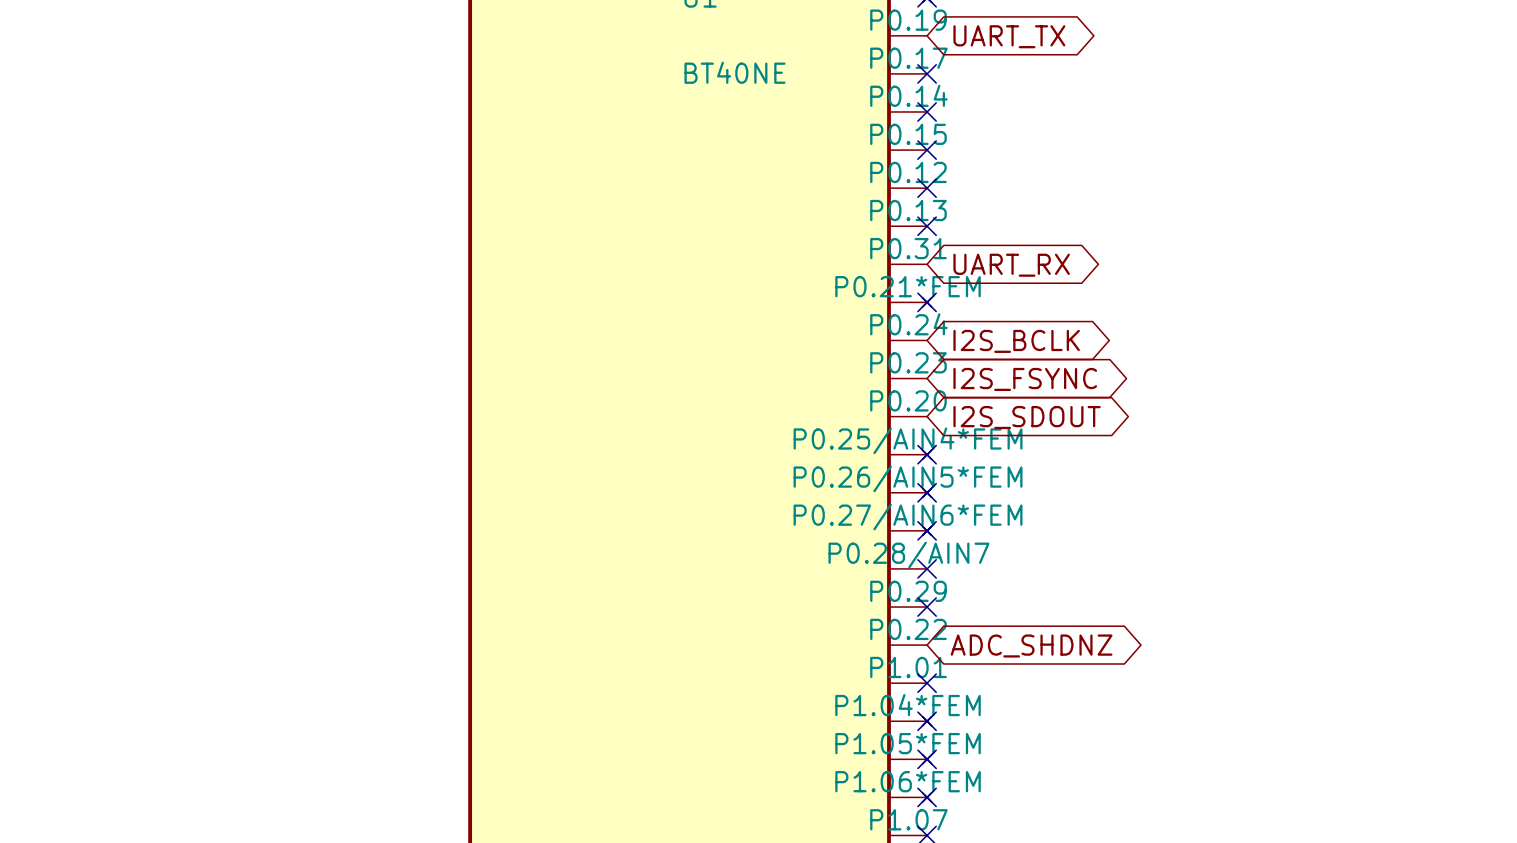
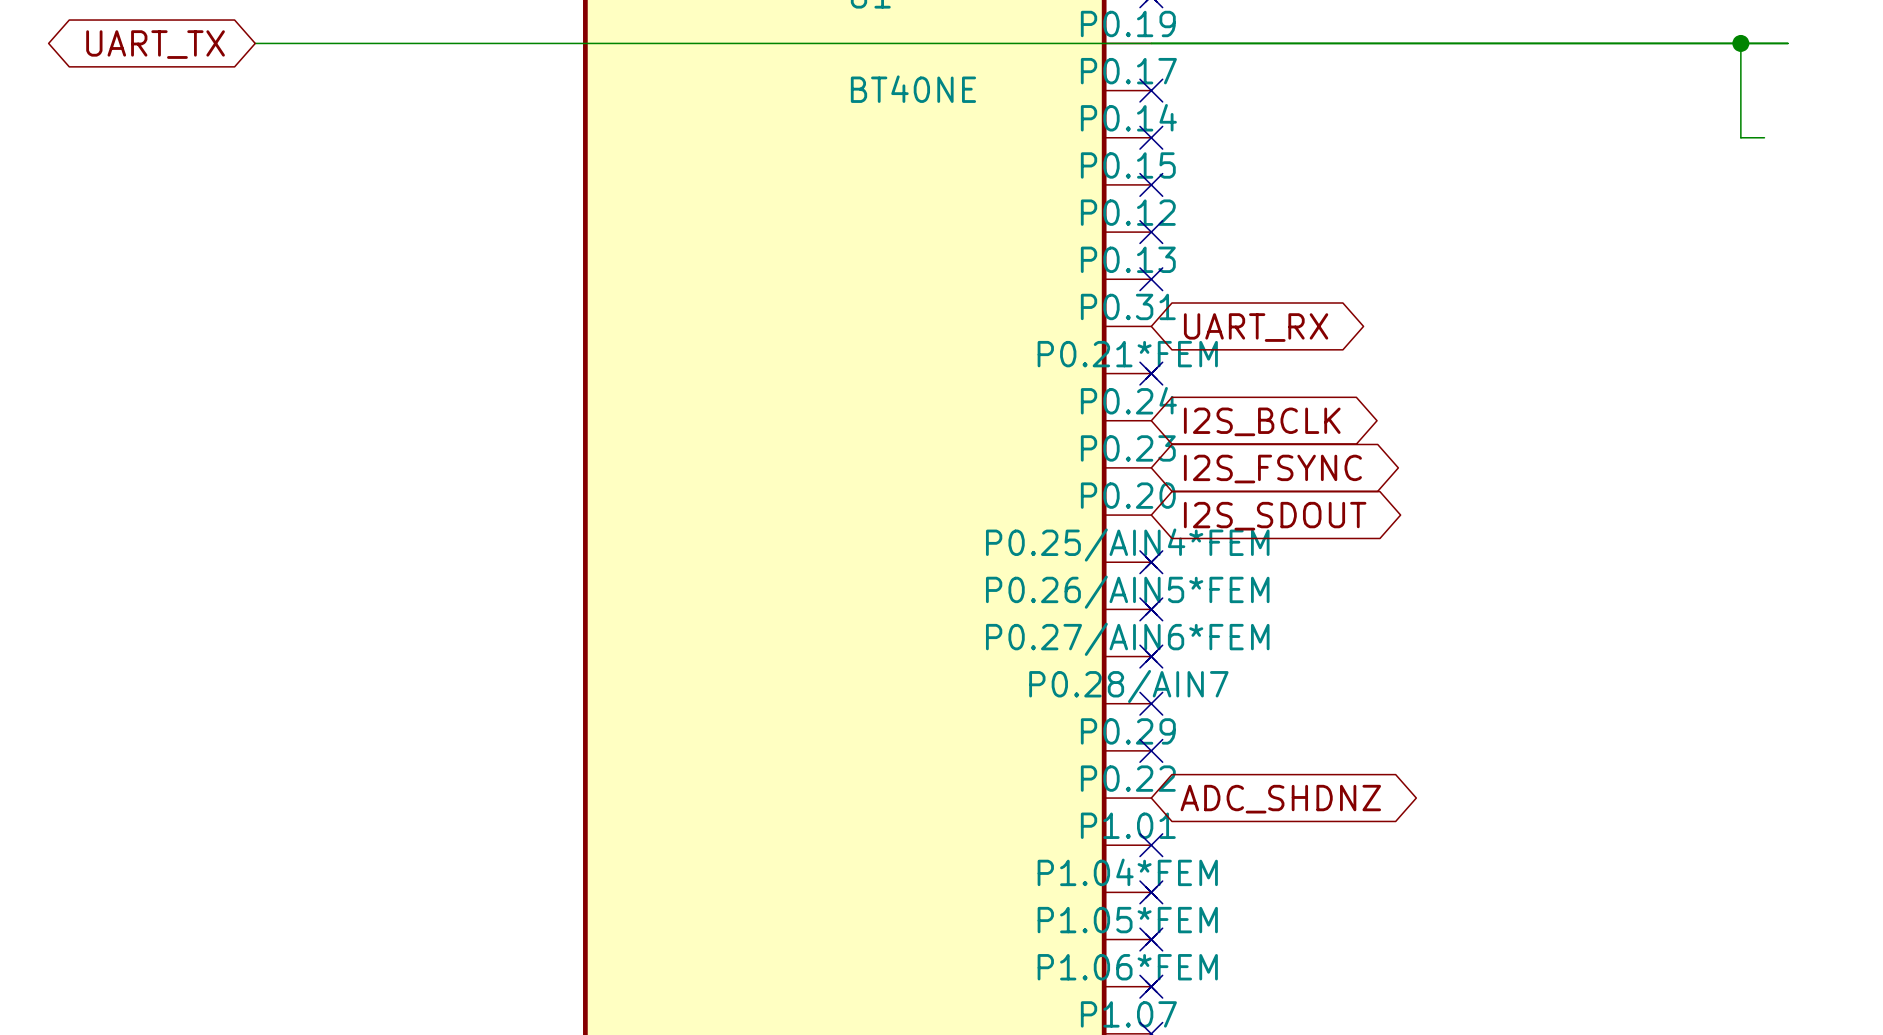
wire: none -> (255, 43) (1788, 43)
wire: none -> (1740, 43) (1740, 137) (1764, 137)
junction: none -> (1740, 43)
global label: none -> UART_TX (155, 44)
global label: UART_TX (1009, 36) -> none

